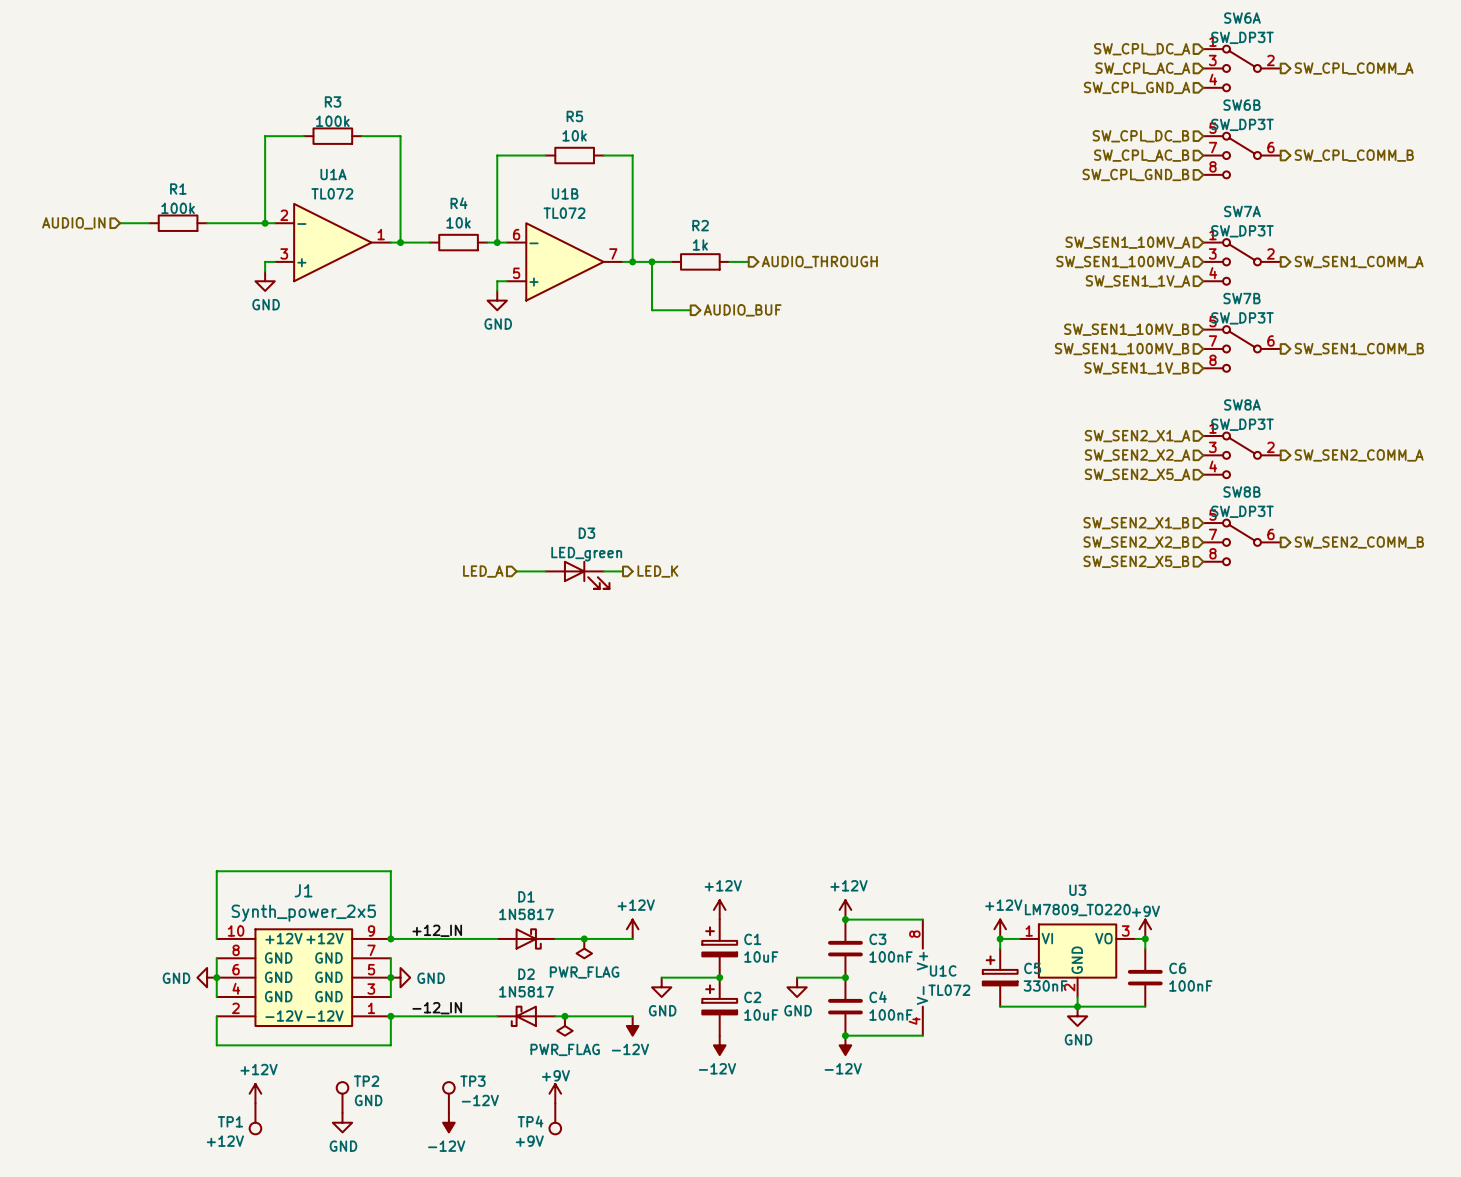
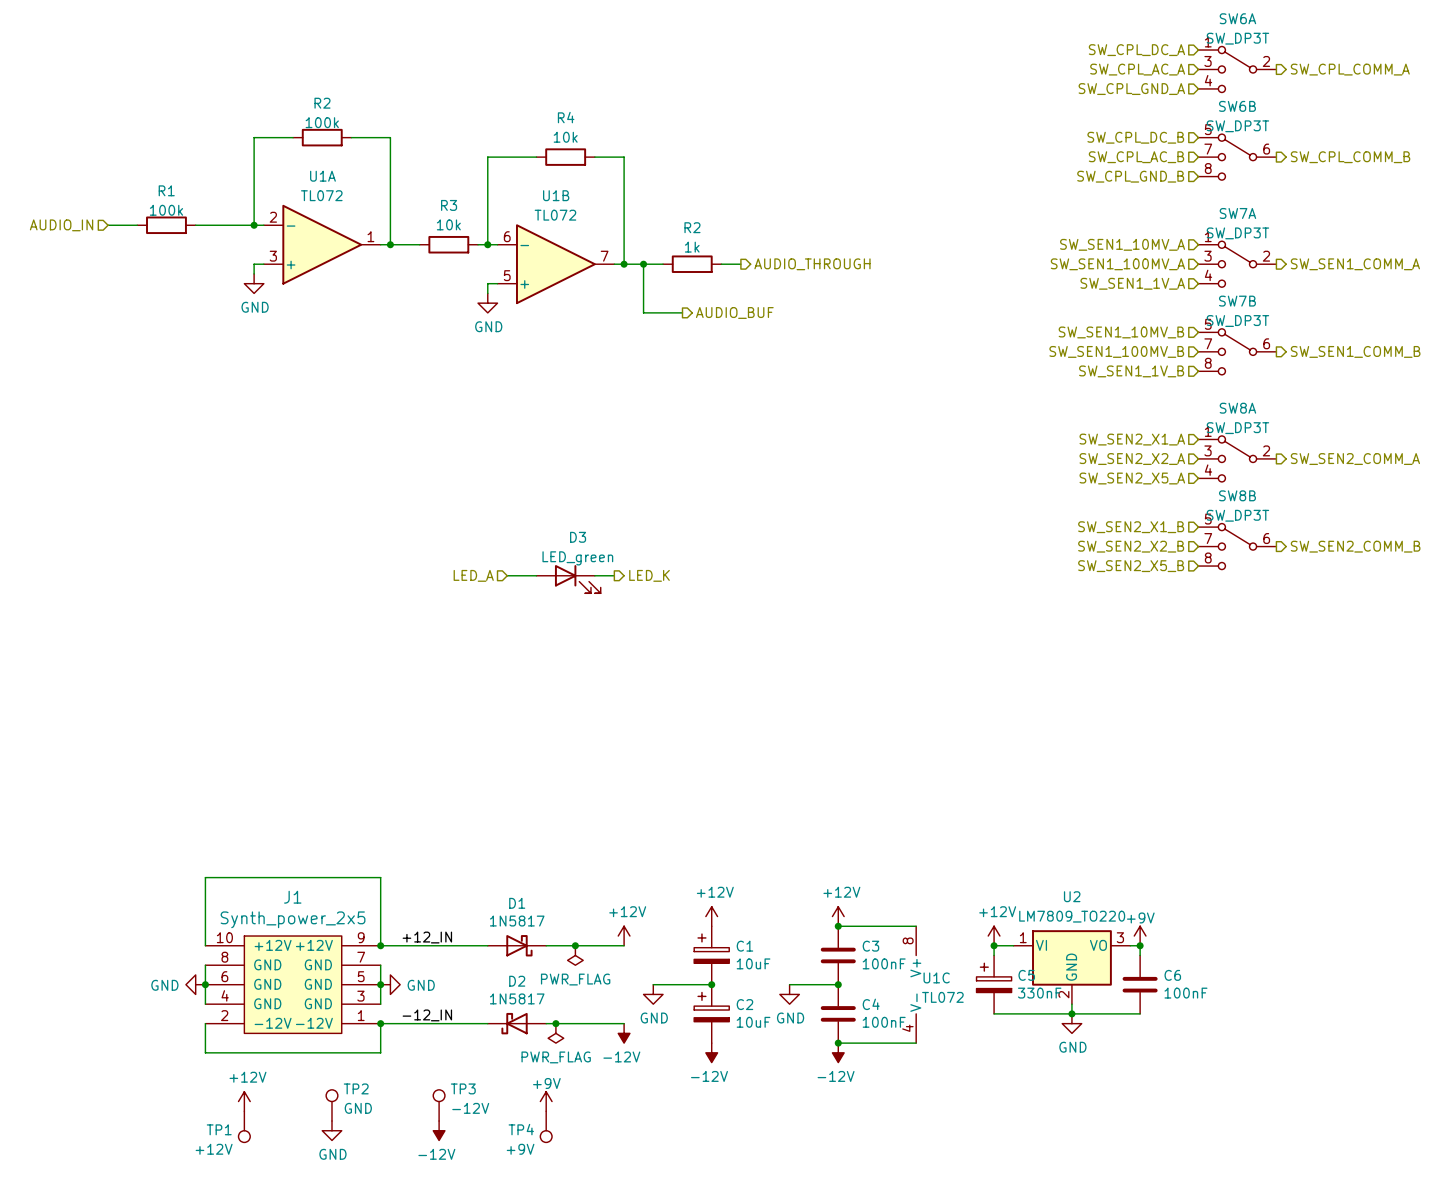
R3 name: R3 (333, 101) -> R2 (322, 103)
R5 name: R5 (574, 116) -> R4 (566, 117)
R4 name: R4 (459, 203) -> R3 (449, 205)
U3 name: U3 (1077, 890) -> U2 (1072, 896)

